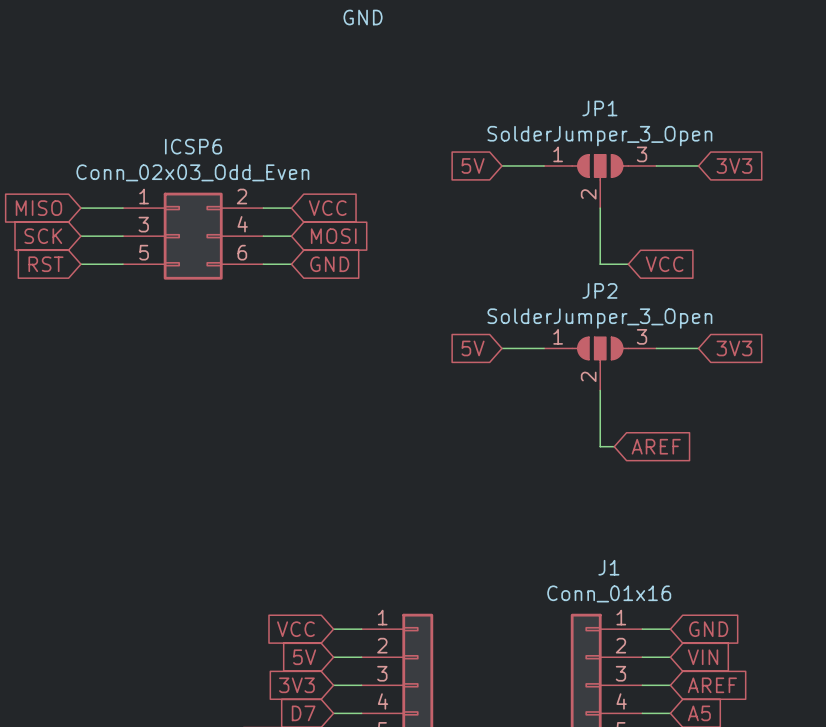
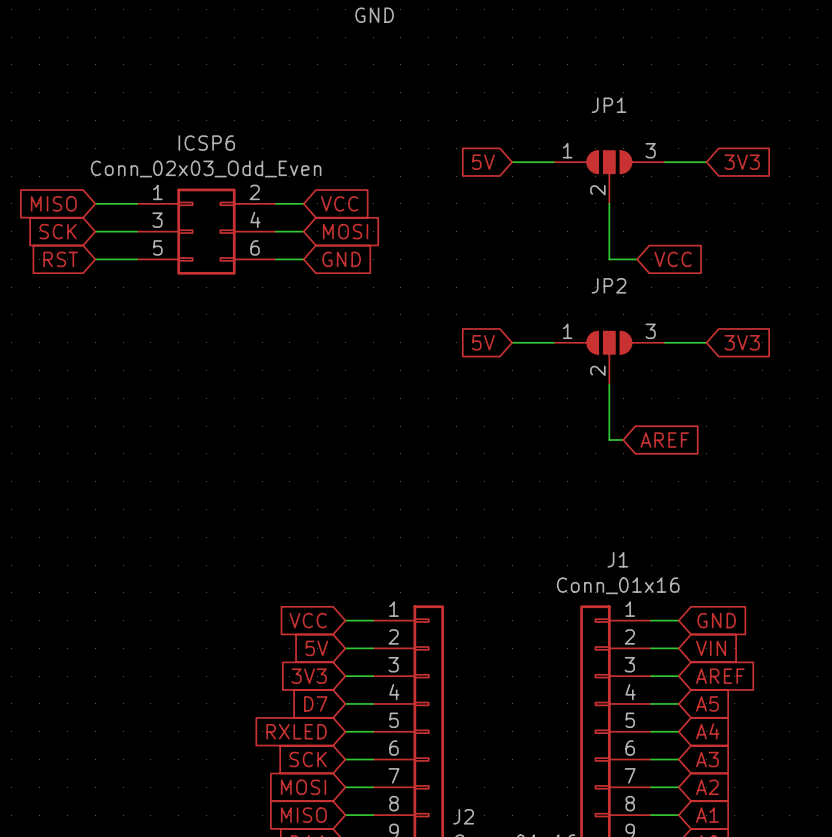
JP1 value: SolderJumper_3_Open (599, 136) -> none
JP2 value: SolderJumper_3_Open (599, 318) -> none

